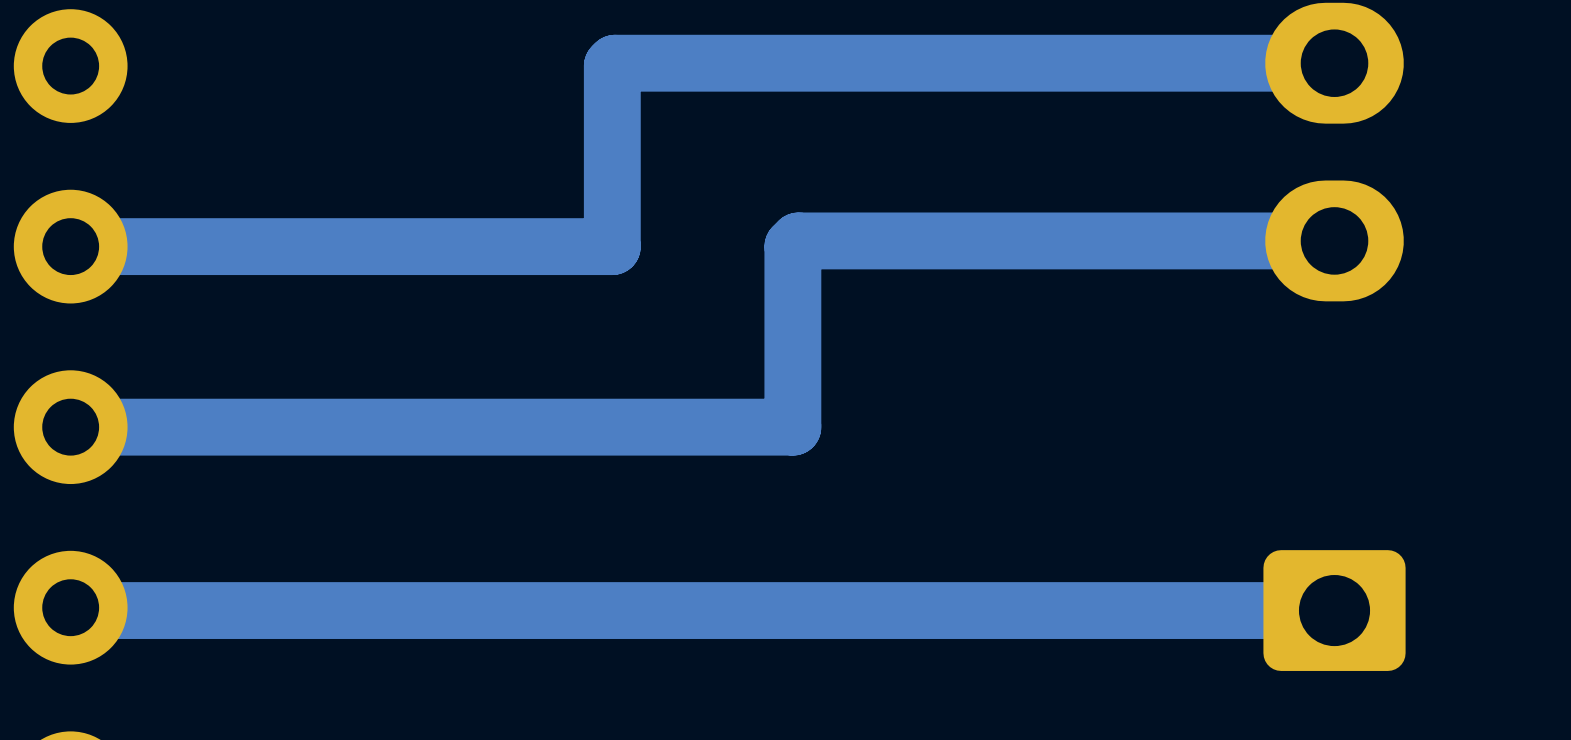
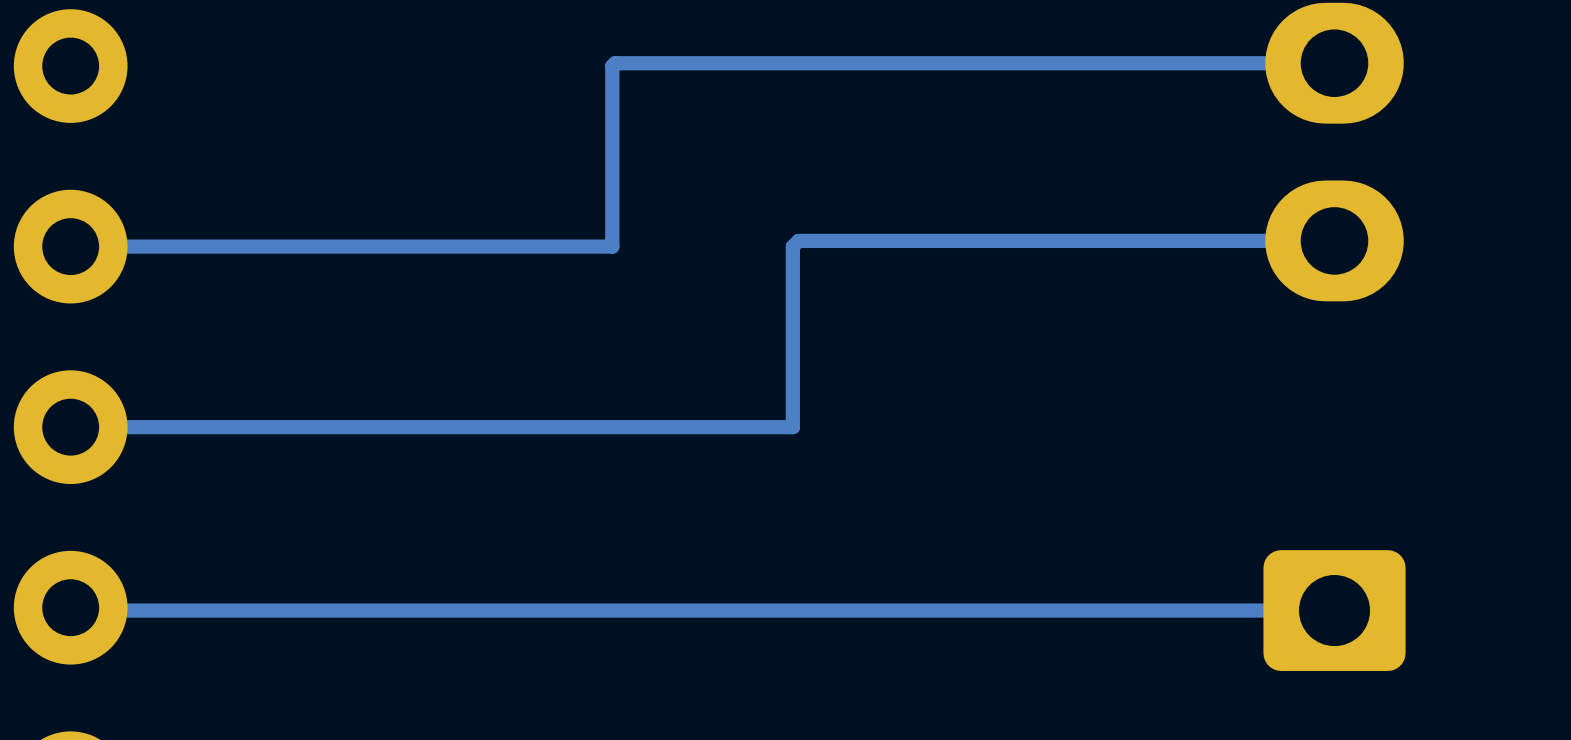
bottom track width: thick (1334, 63) (615, 63) (612, 66) (612, 246) (70, 246) -> thin (1334, 63) (615, 63) (612, 66) (612, 246) (70, 246)
bottom track width: thick (1334, 240) (798, 240) (792, 246) (792, 427) (70, 427) -> thin (1334, 240) (798, 240) (792, 246) (792, 427) (70, 427)
bottom track width: thick (70, 607) (73, 610) (1334, 610) -> thin (70, 607) (73, 610) (1334, 610)

